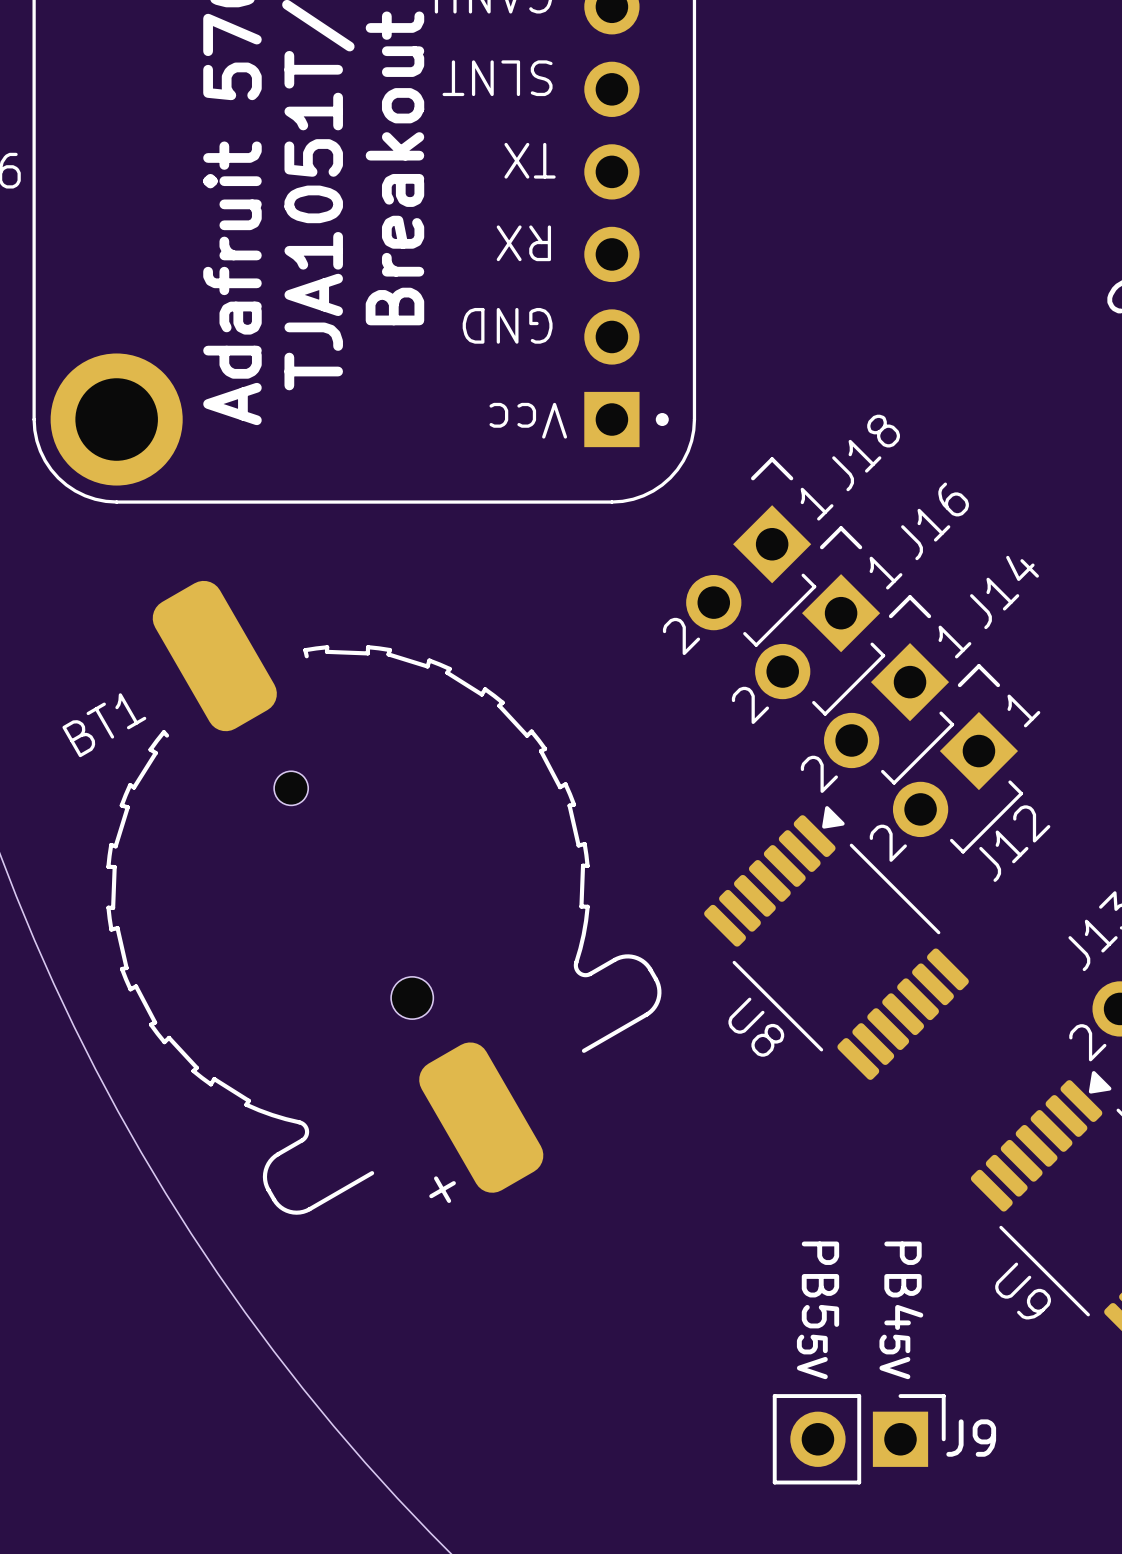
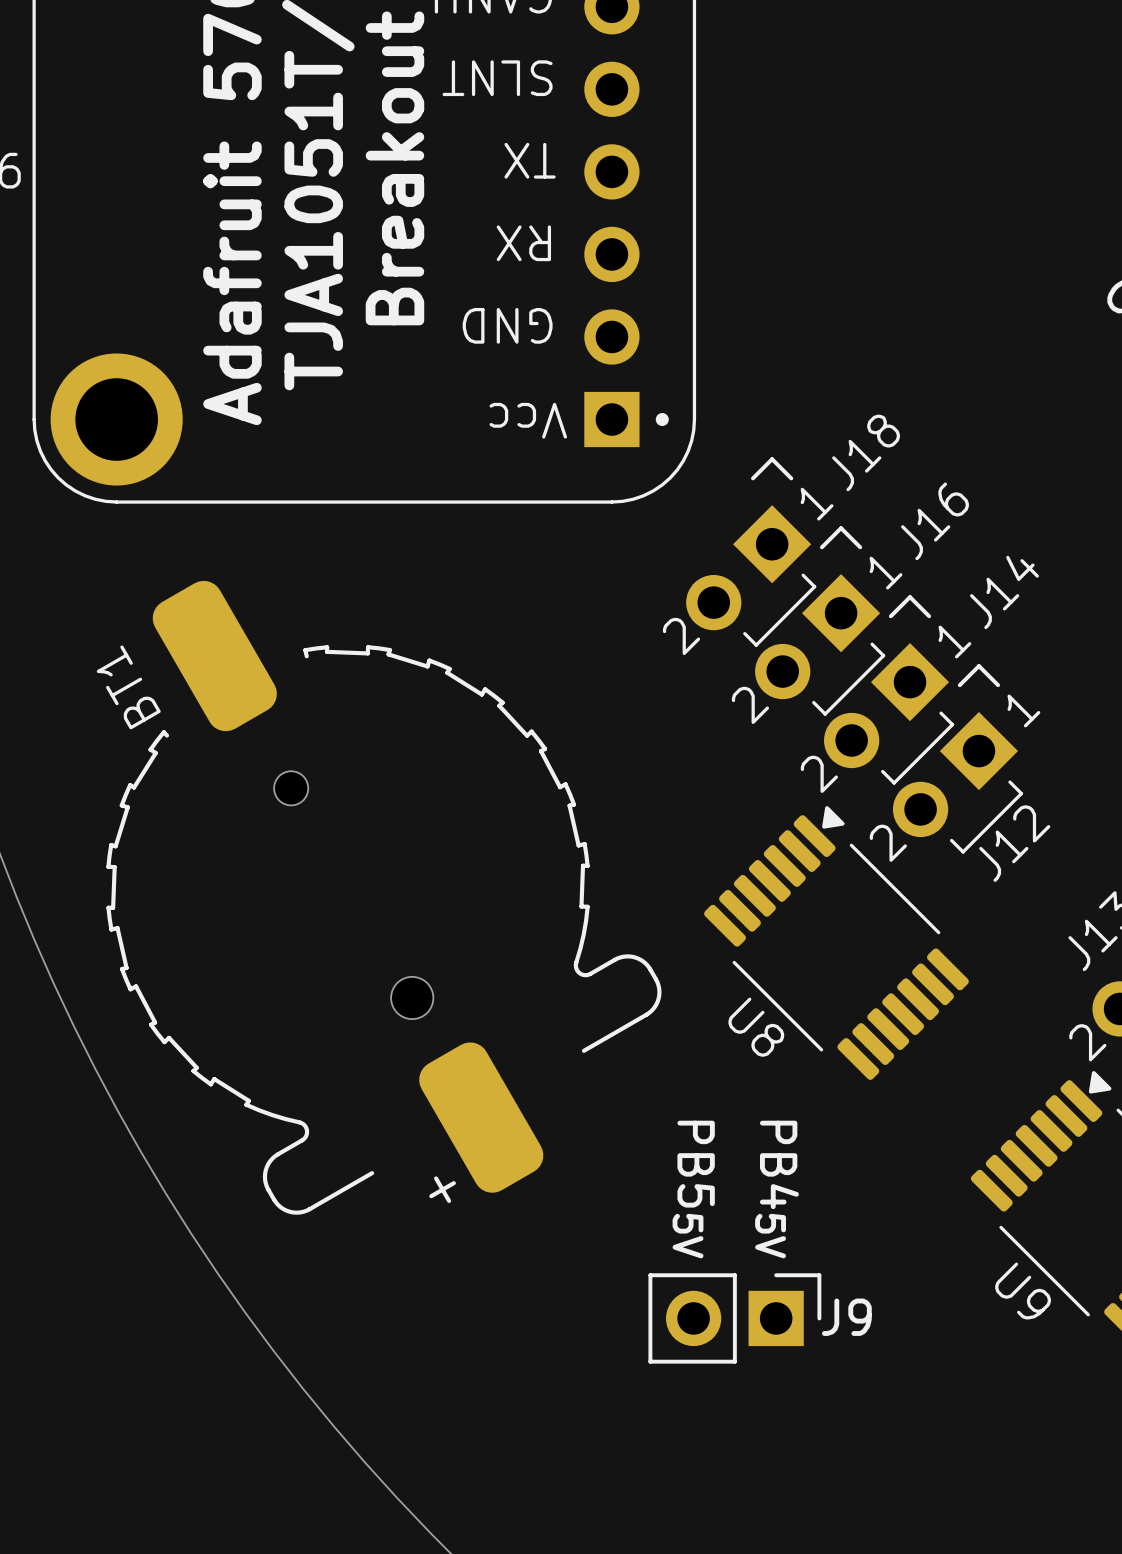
BT1 name rotation: 0° (104, 725) -> 90° counterclockwise (128, 687)
text position: PB55V (818, 1310) -> PB55V (693, 1189)
text position: PB45V (901, 1310) -> PB45V (777, 1189)
J9 position: (859, 1439) -> (734, 1318)

